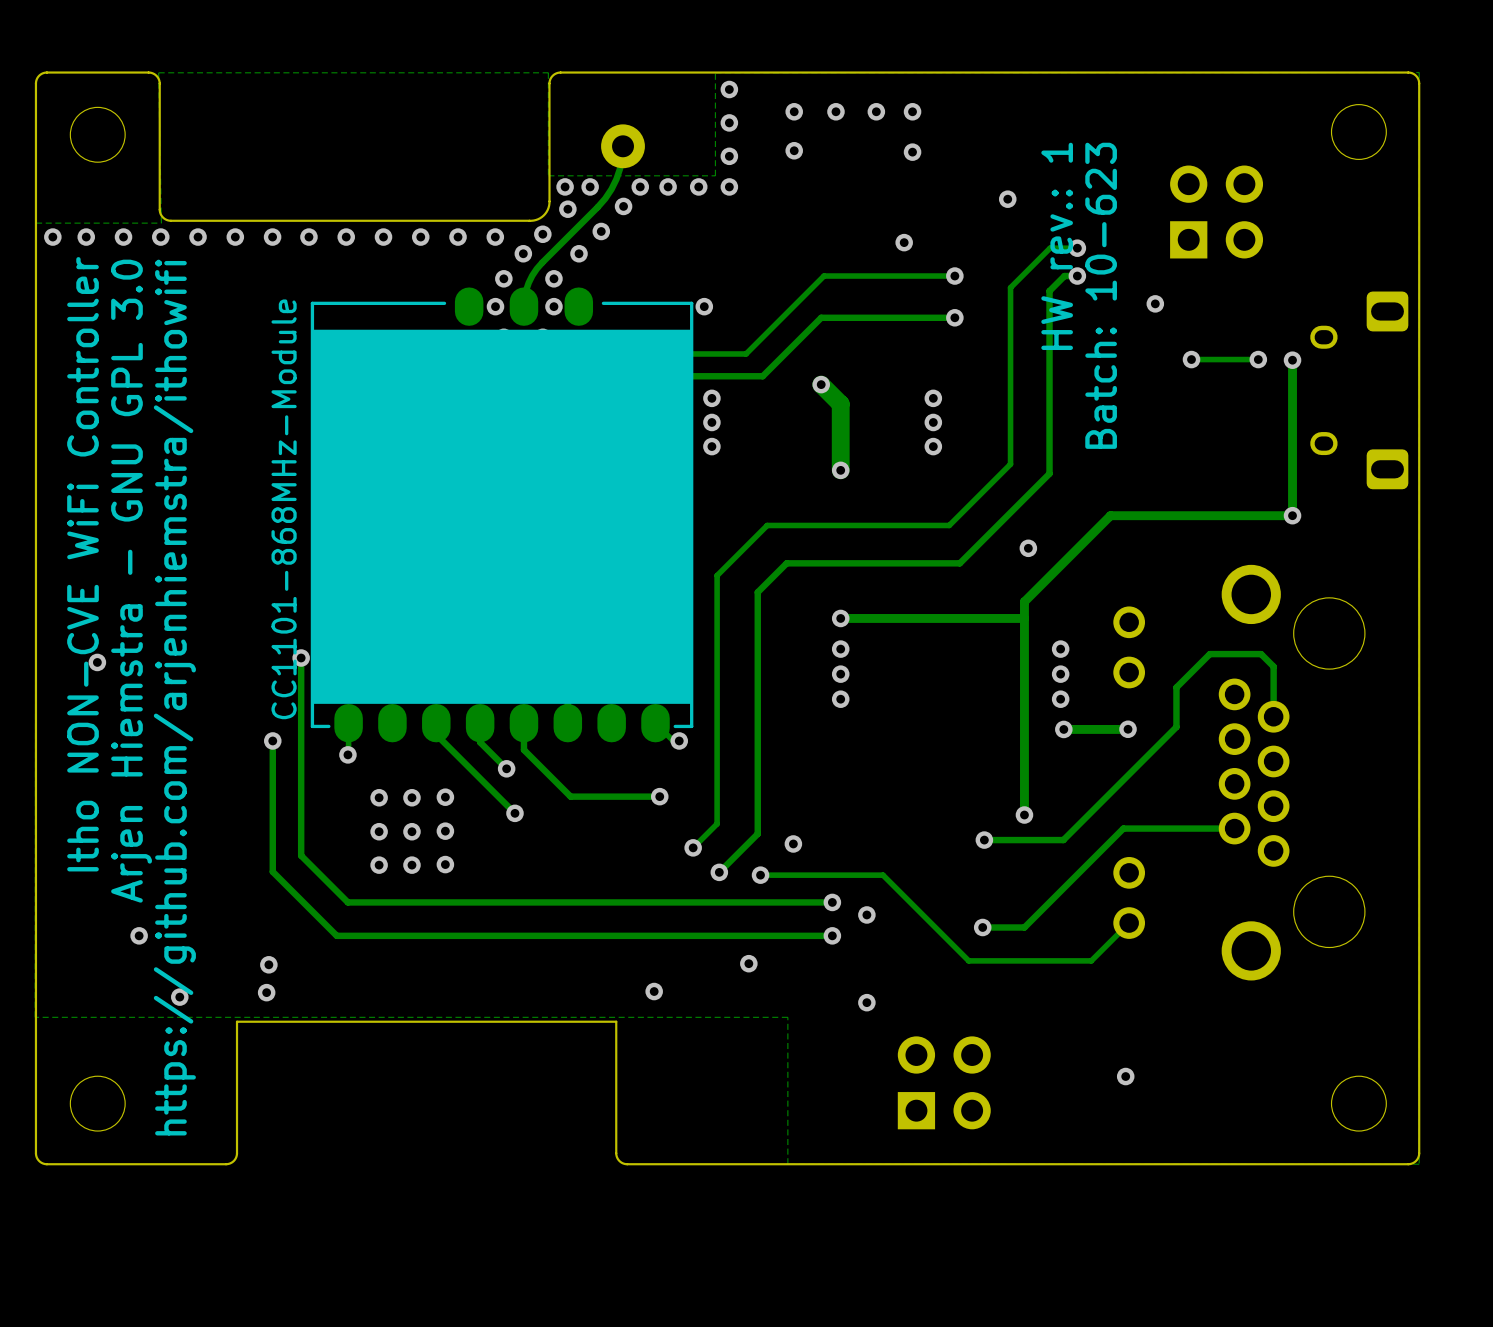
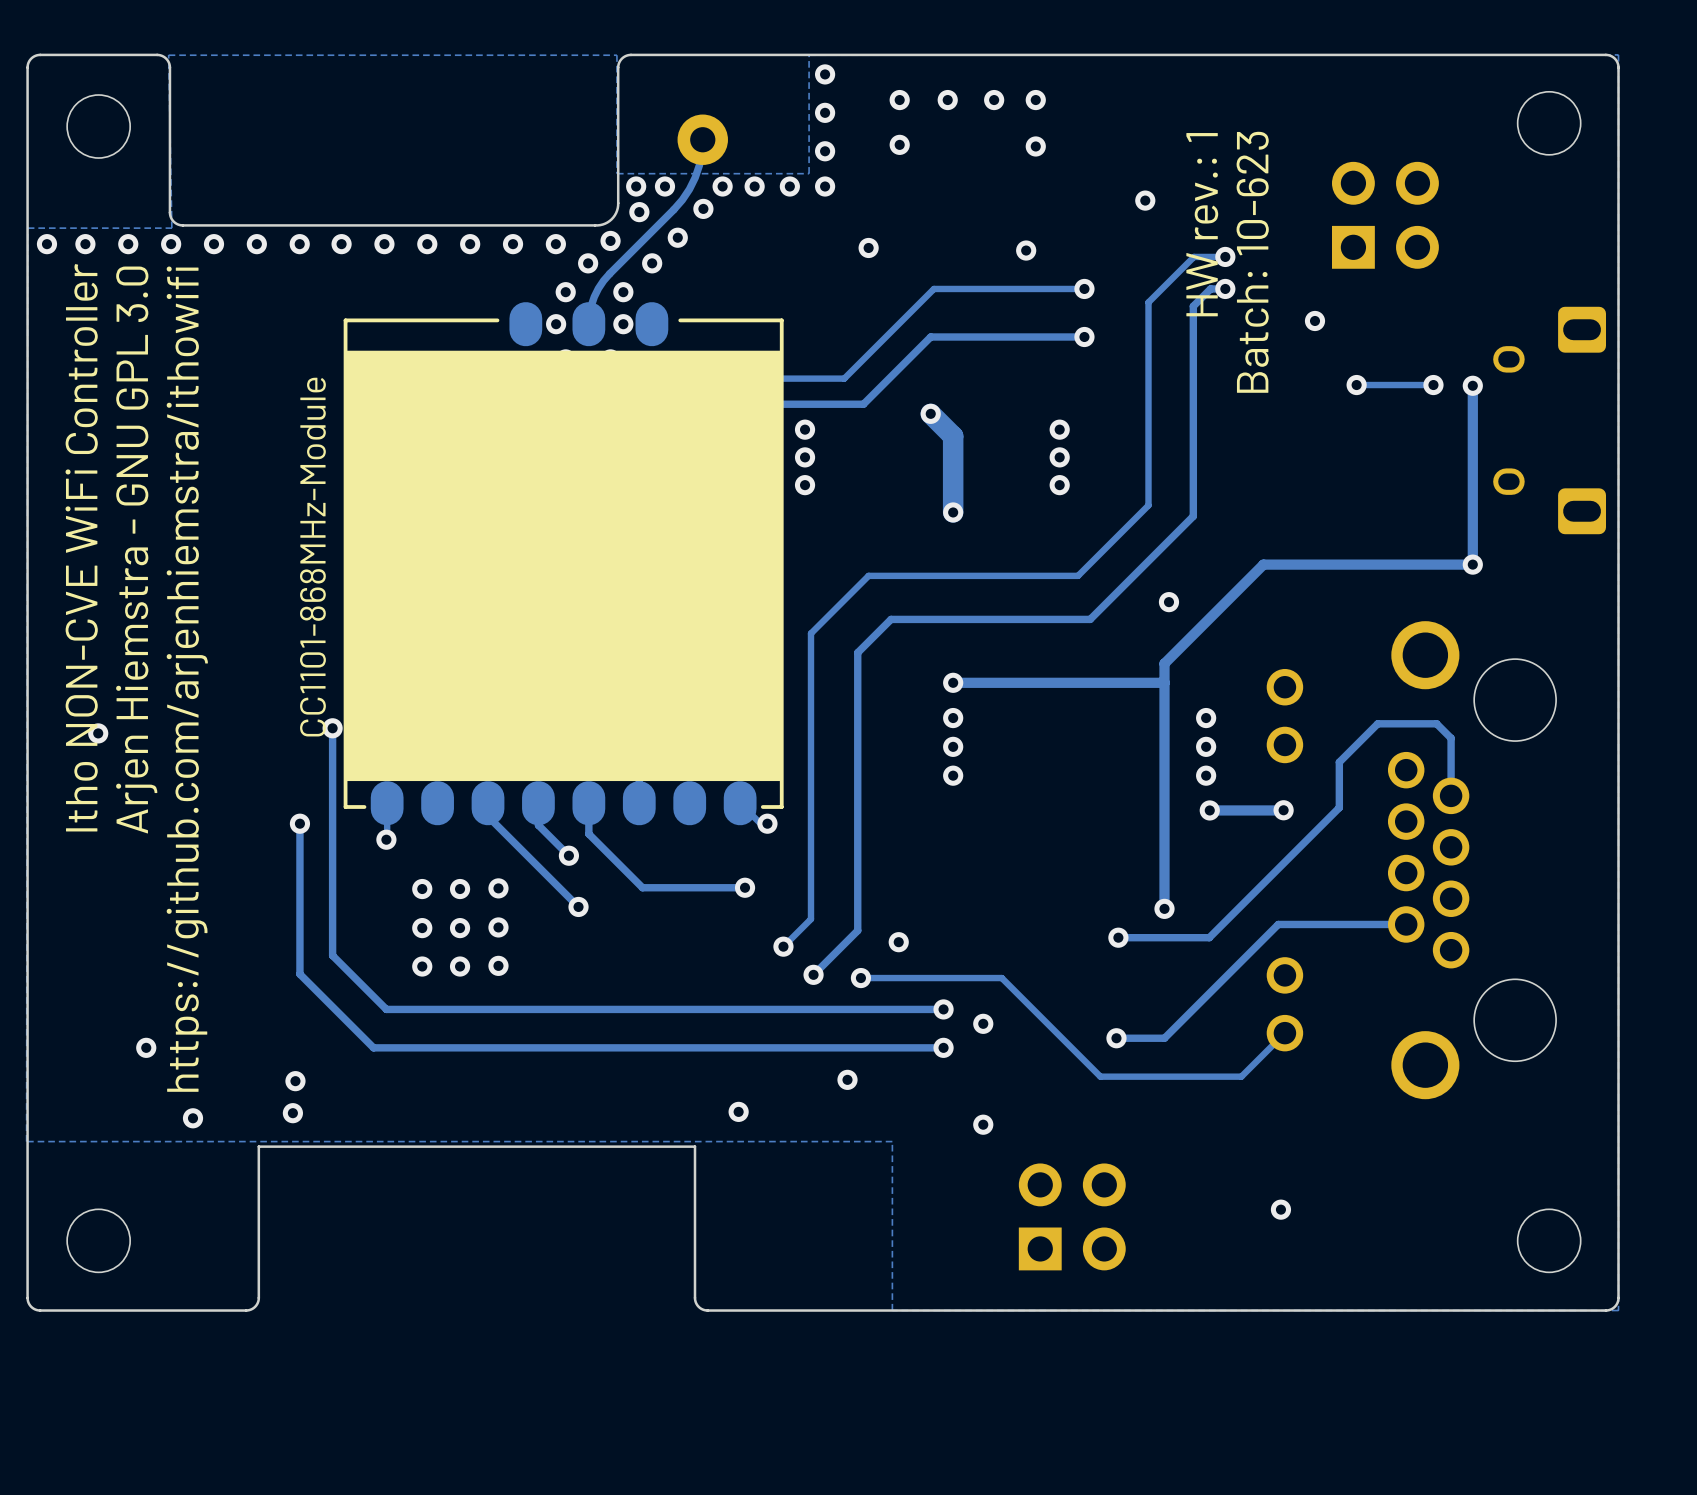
via position: (704, 306) -> (868, 247)

